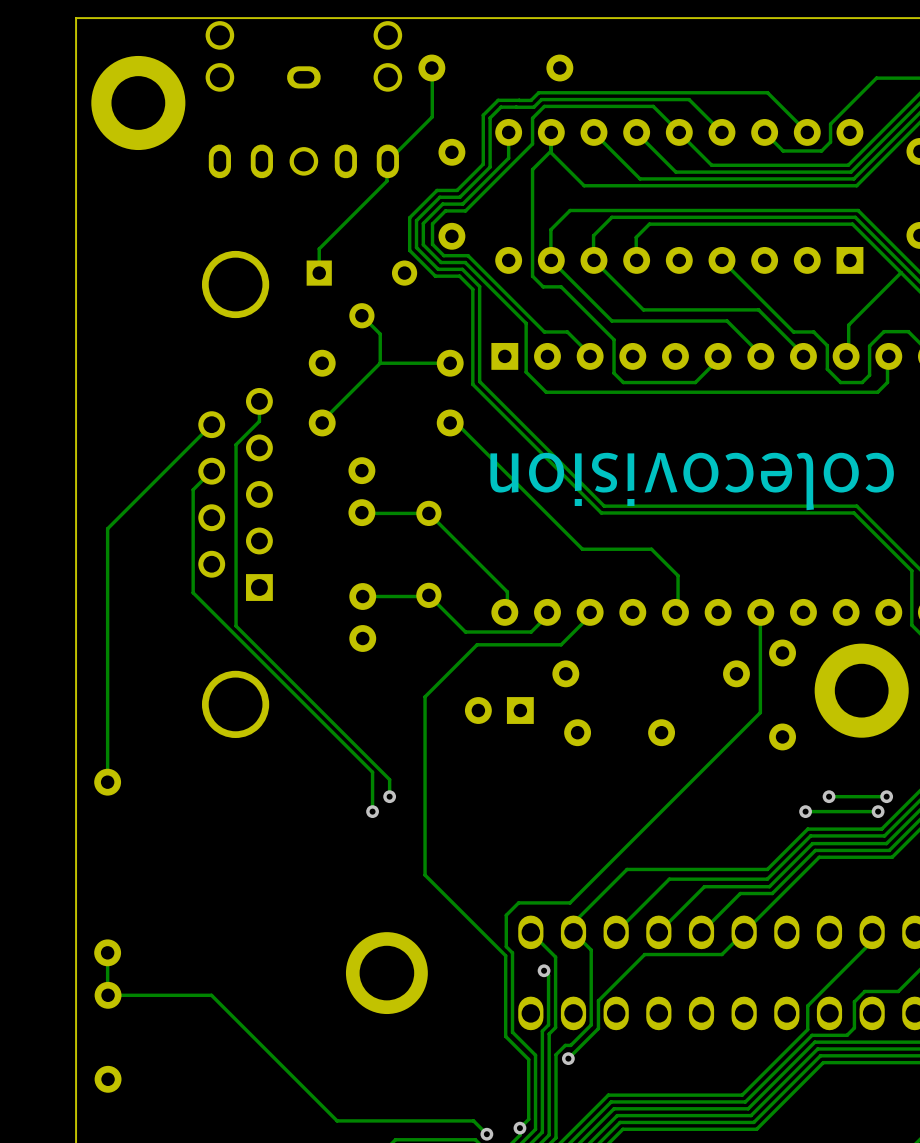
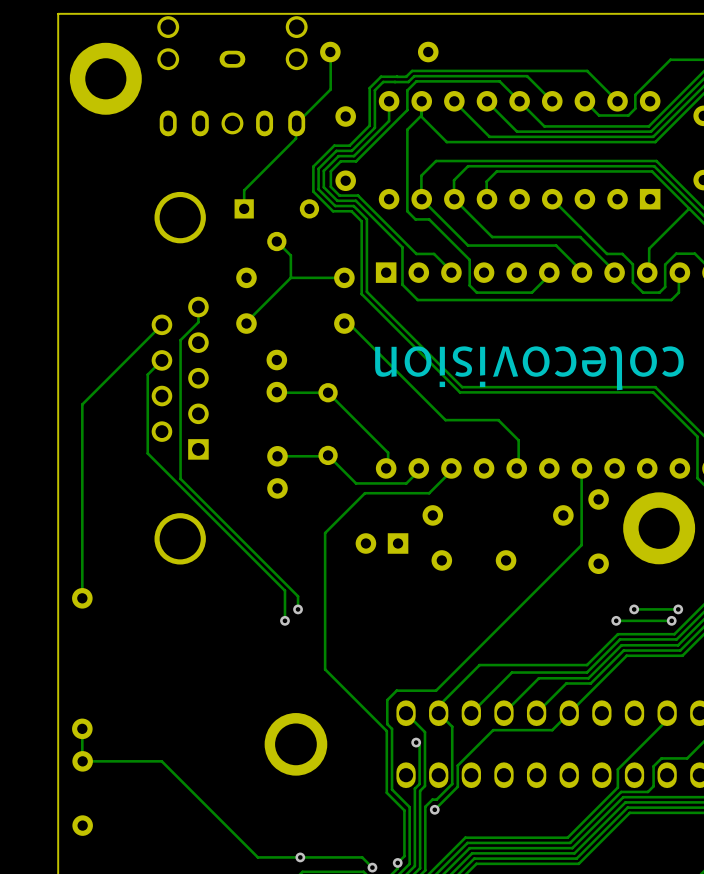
via: none -> (300, 857)

